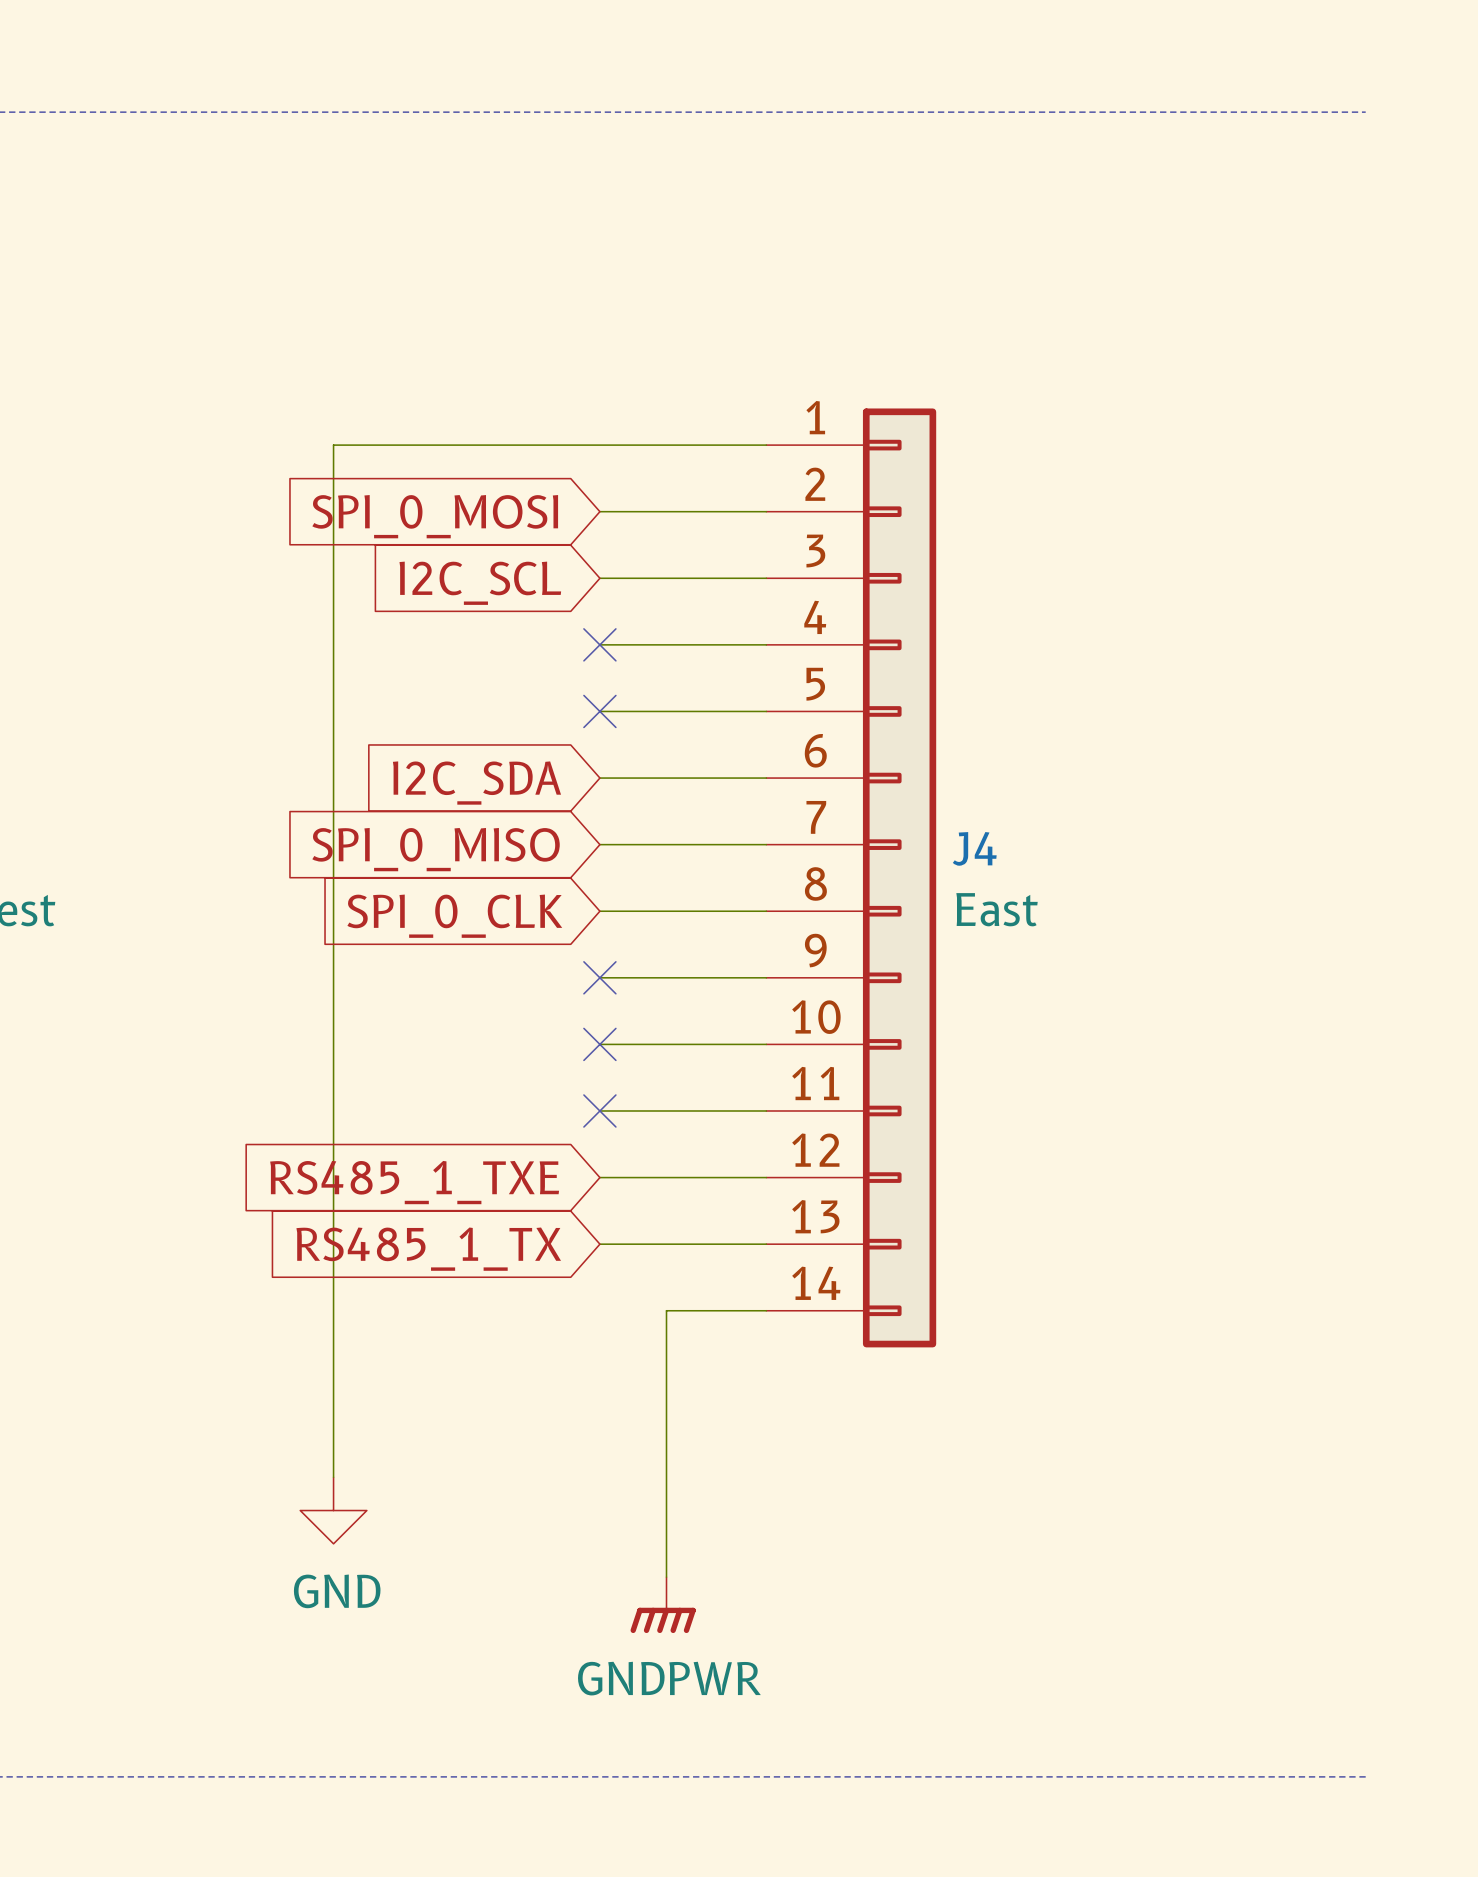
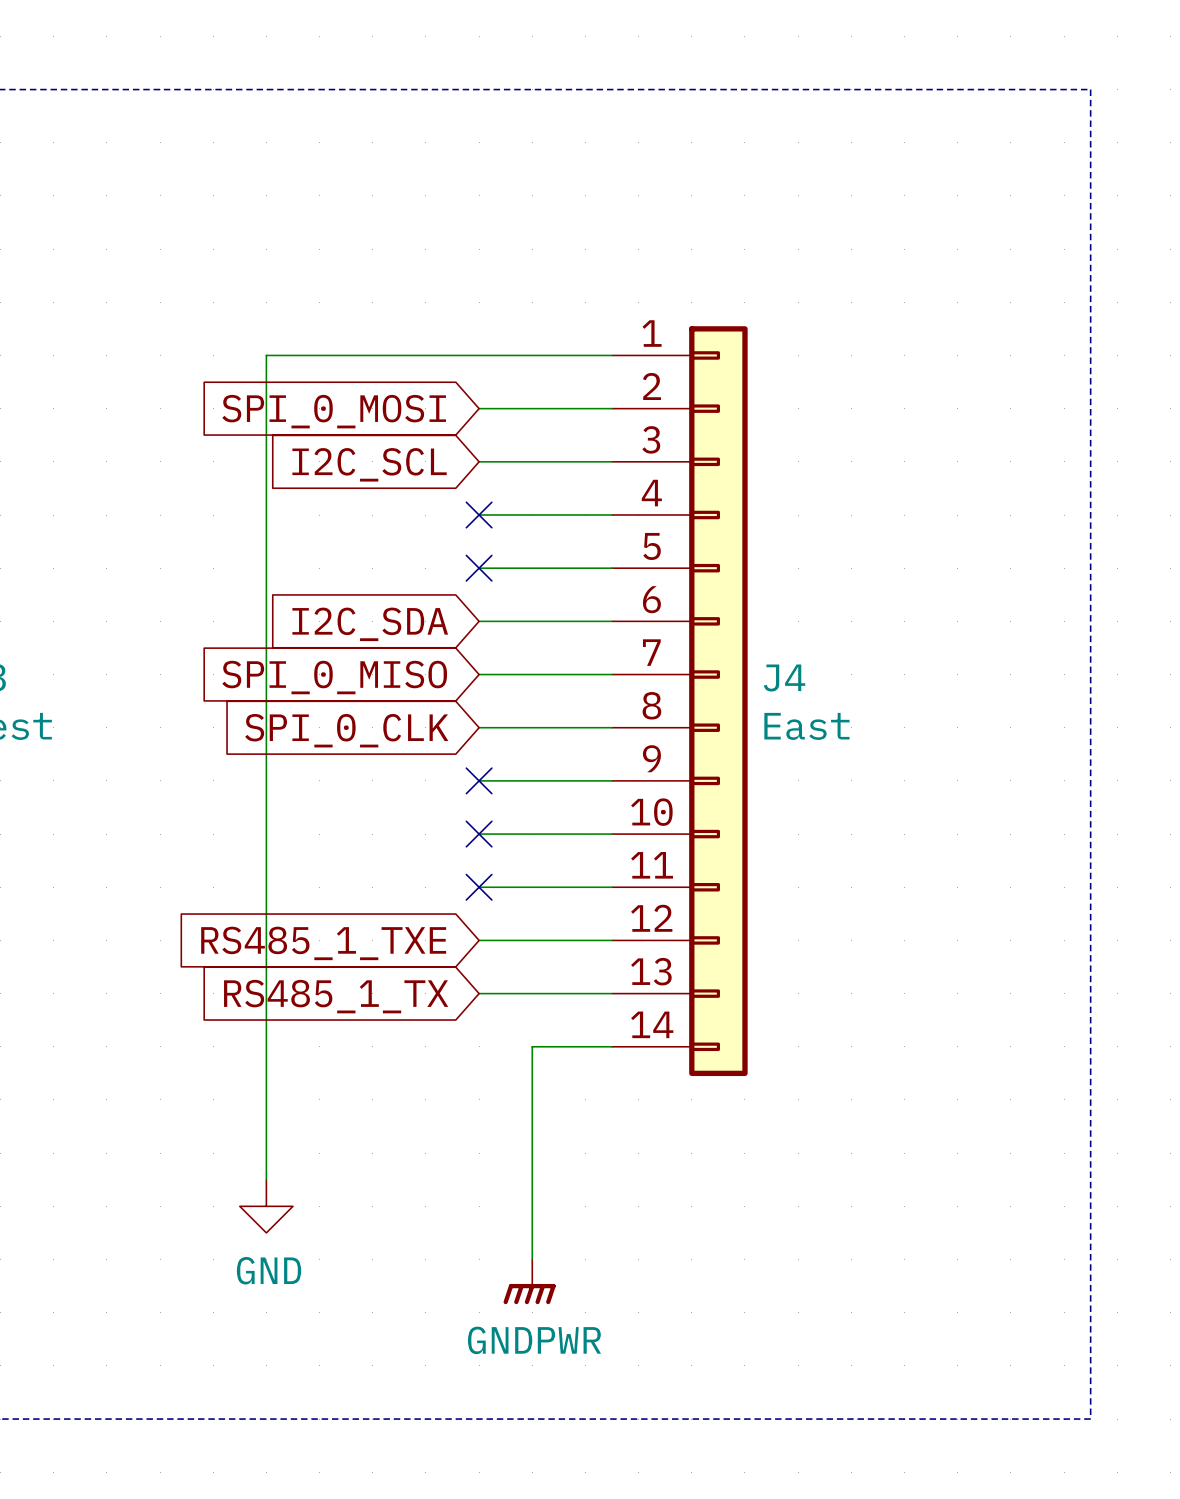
line: none -> (1090, 89) (1090, 1419)

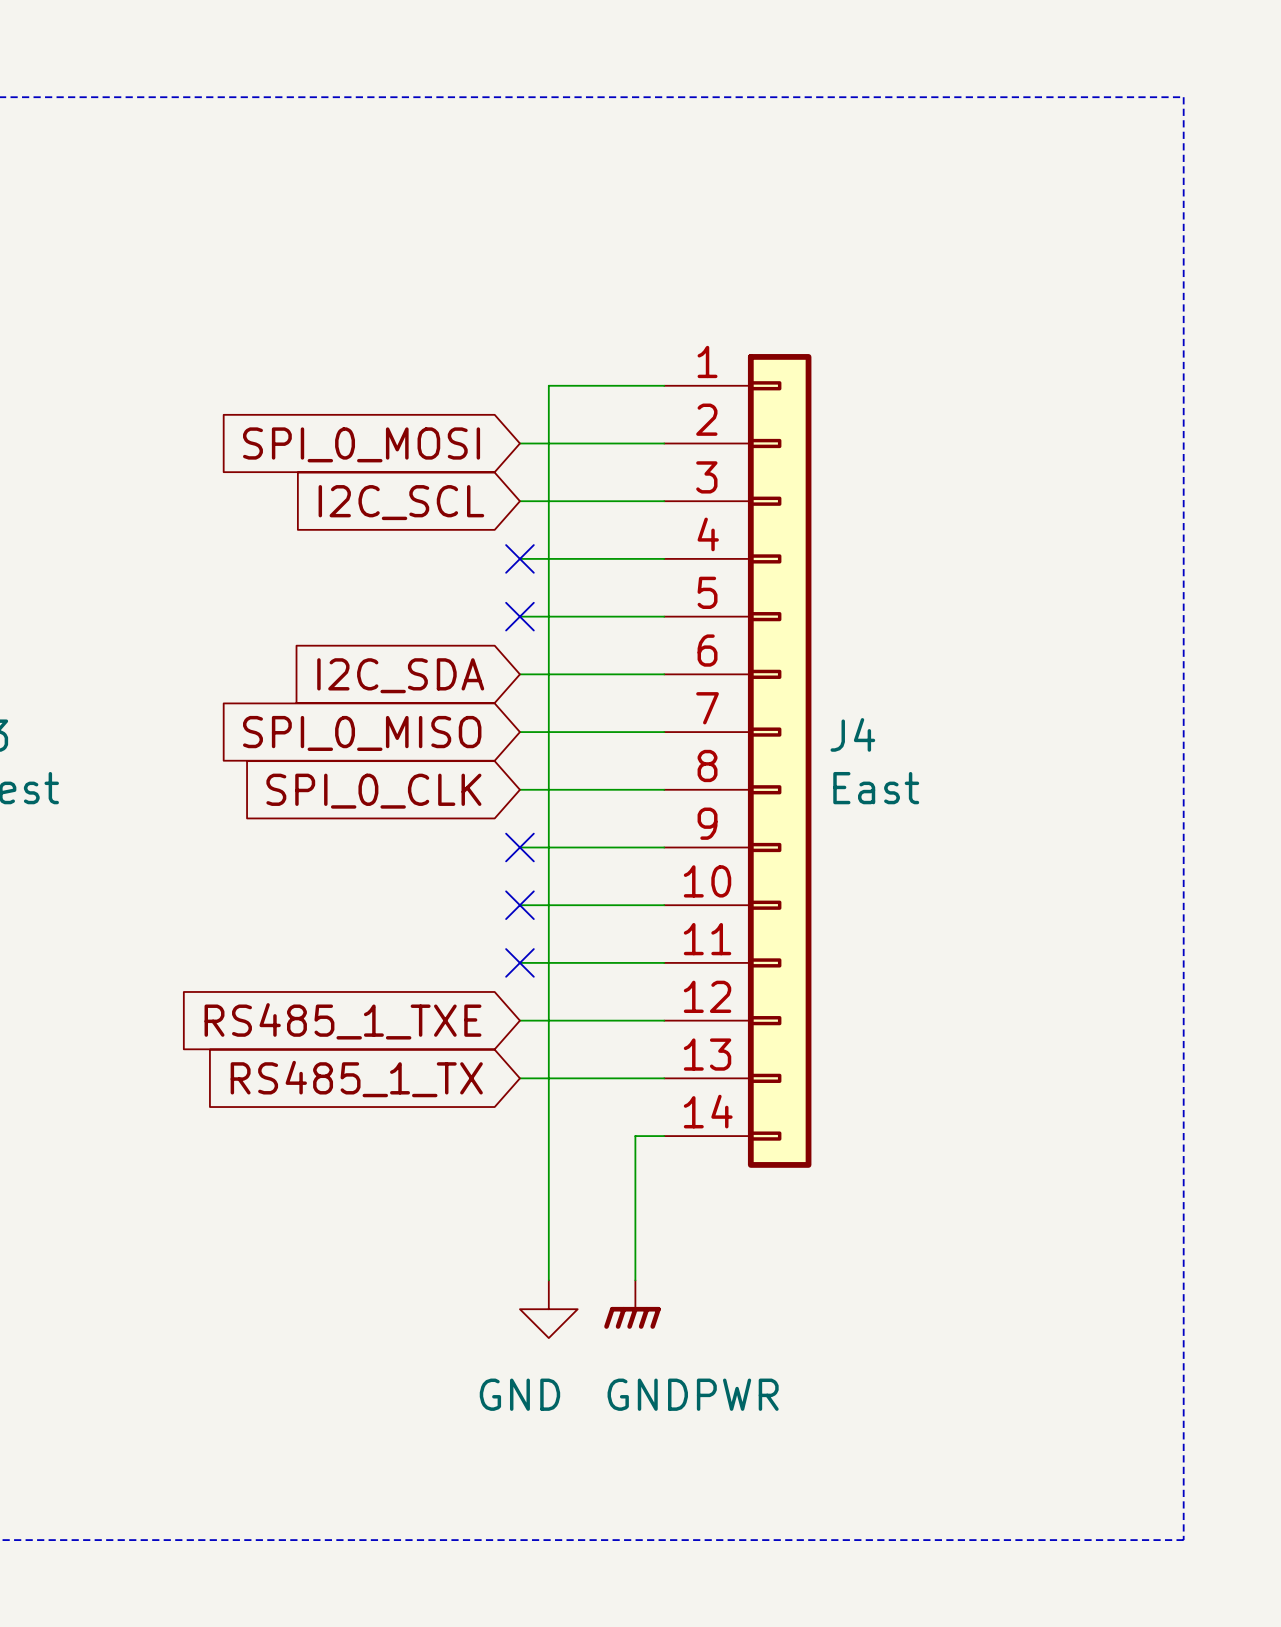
wire: (505, 355) (266, 355) (266, 1179) -> (548, 385) (548, 1280)
wire: (585, 1046) (532, 1046) (532, 1259) -> (635, 1136) (635, 1280)
power symbol position: GND (266, 1206) -> GND (548, 1309)
power symbol text position: GND (269, 1270) -> GND (519, 1394)
power symbol position: GNDPWR (529, 1281) -> GNDPWR (632, 1304)
power symbol text position: GNDPWR (534, 1340) -> GNDPWR (693, 1394)

